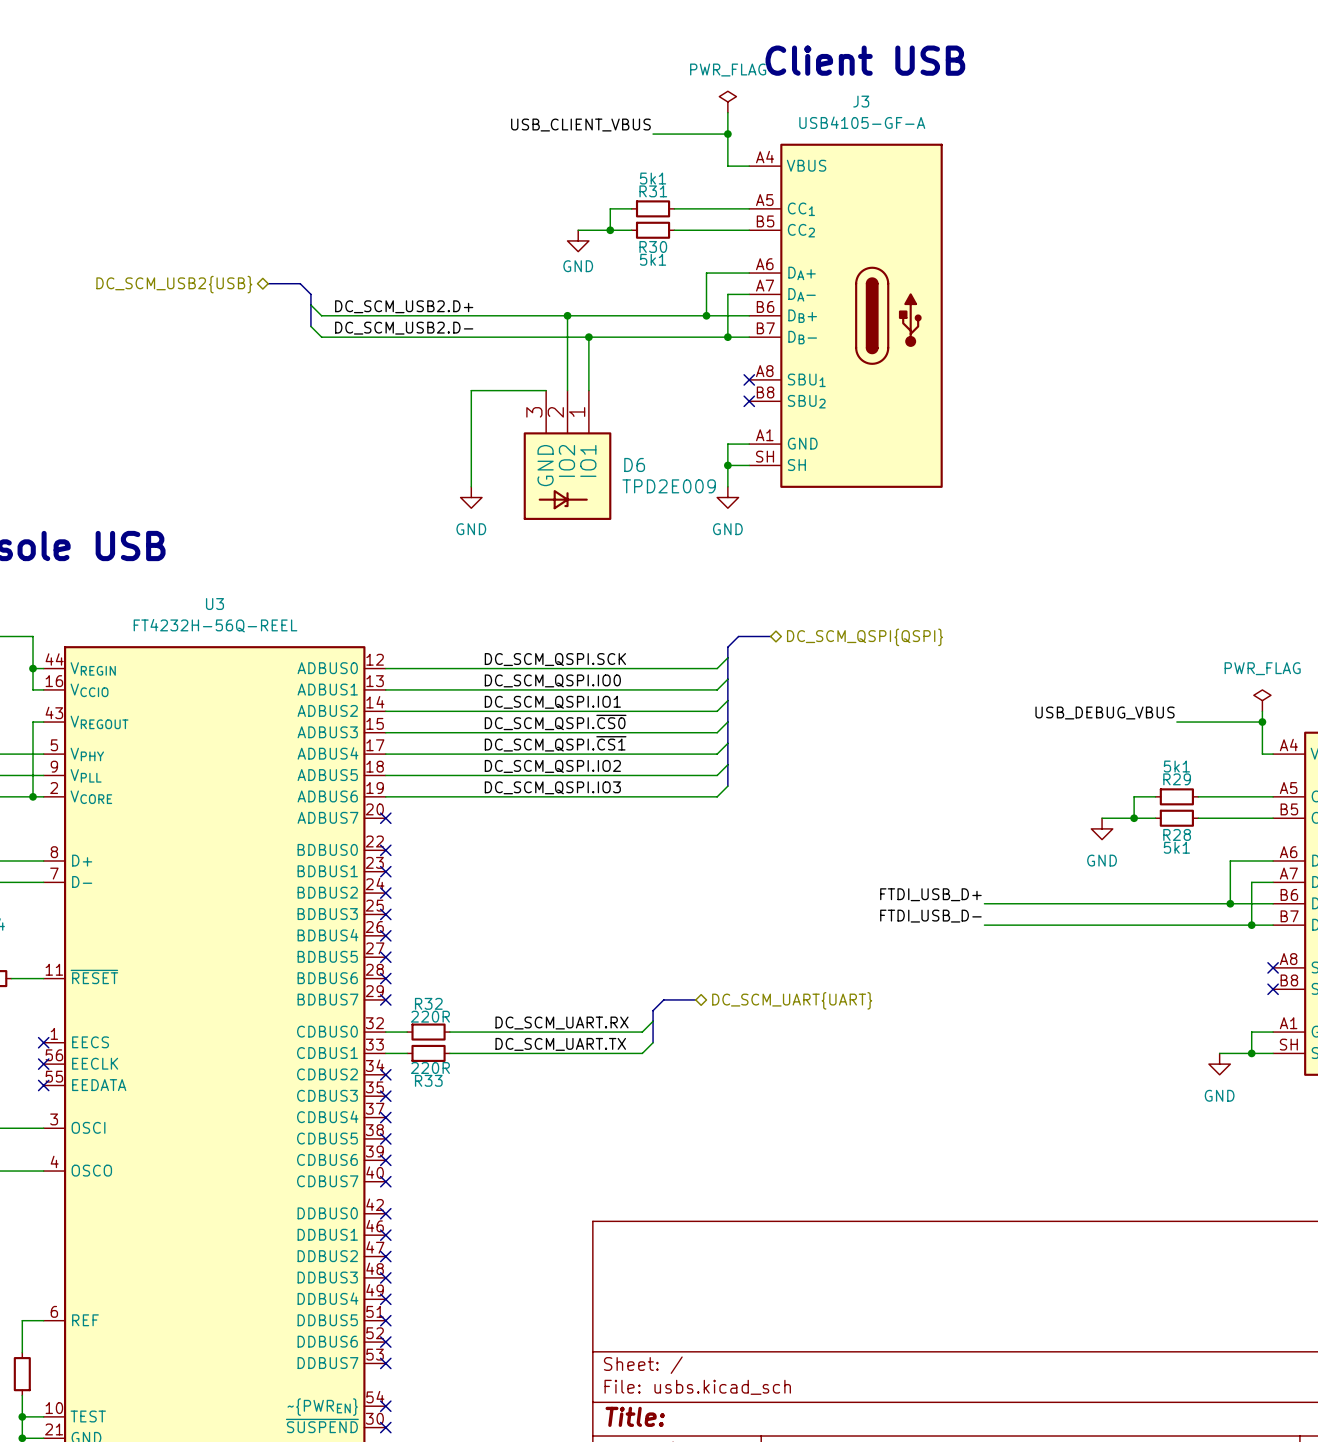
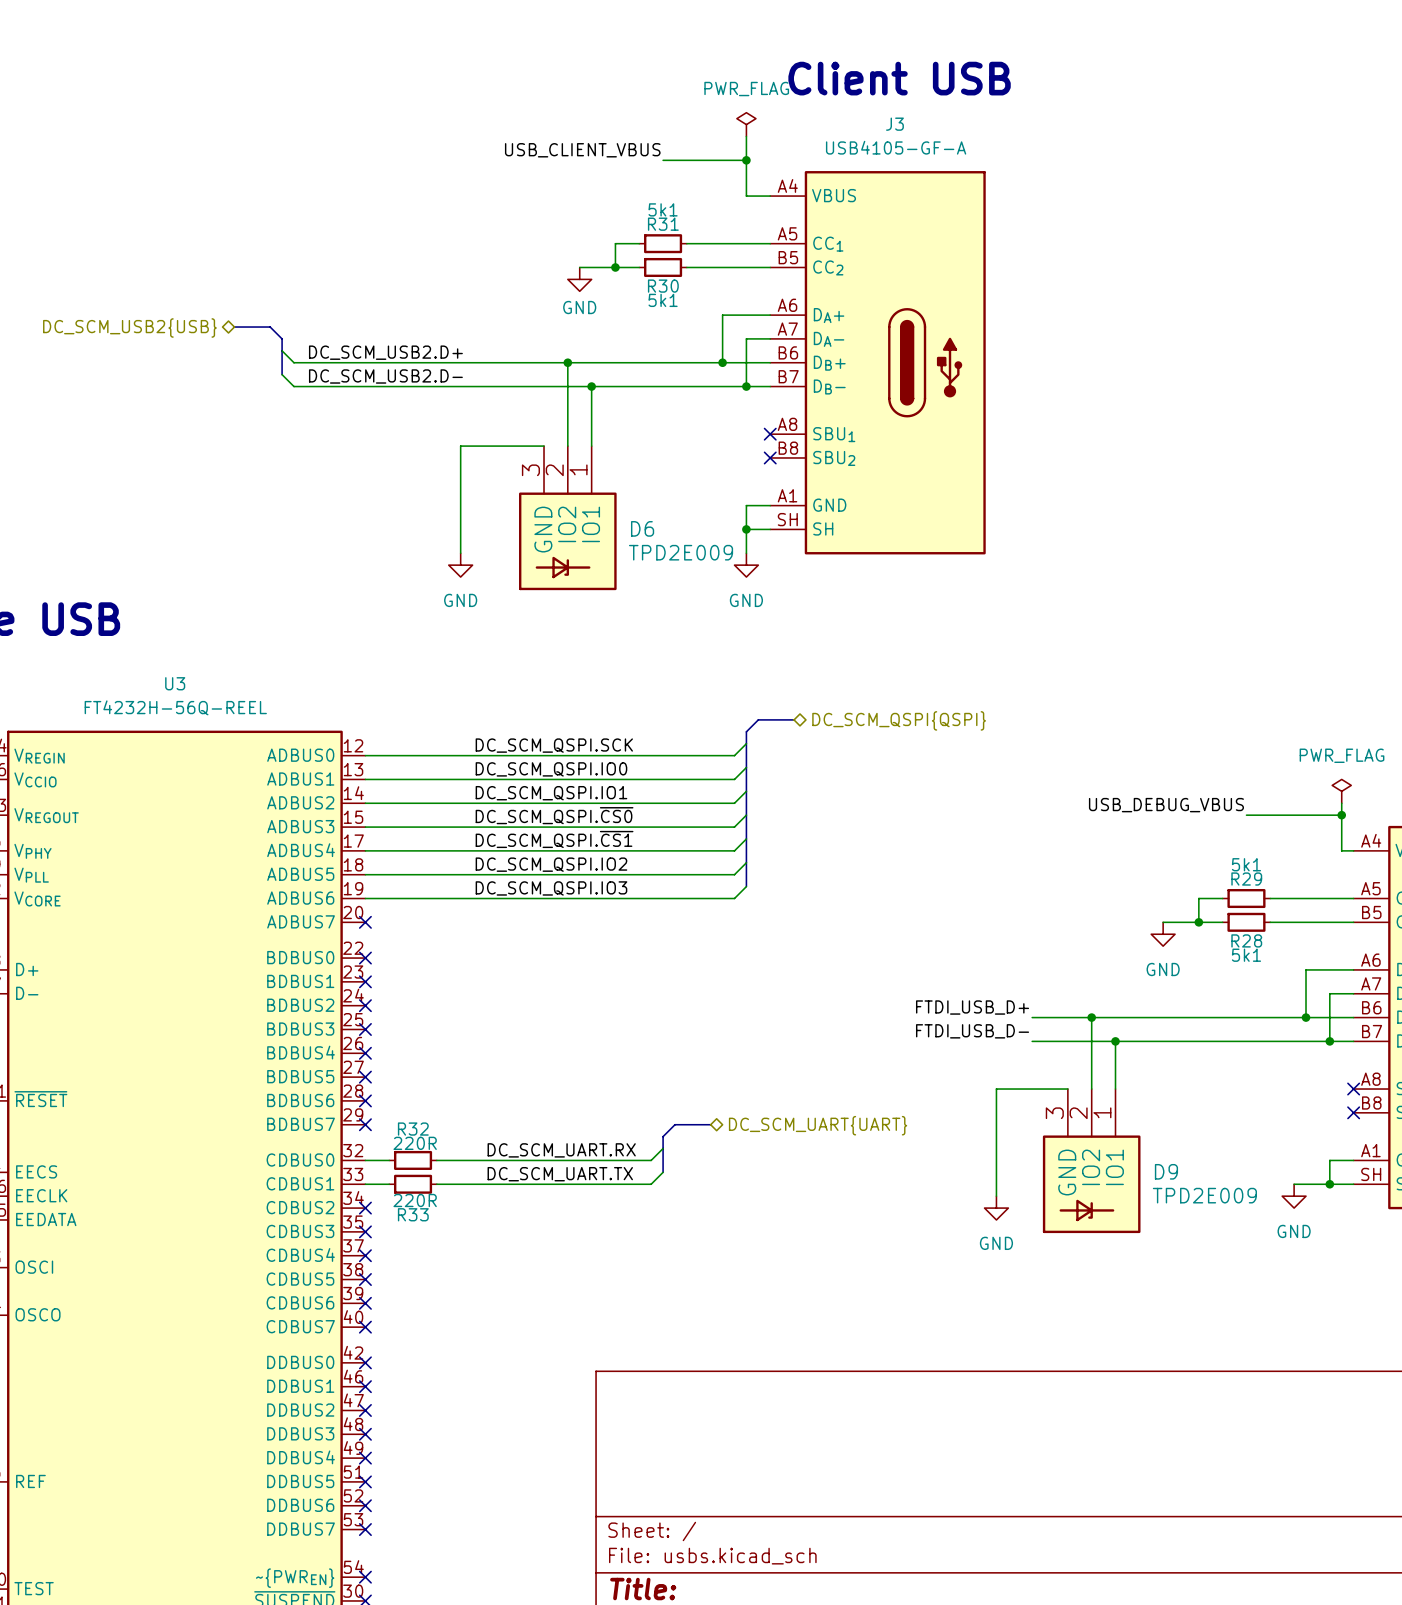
wire: none -> (1091, 1017) (1091, 1089)
junction: none -> (1091, 1017)
wire: none -> (1115, 1041) (1115, 1089)
junction: none -> (1115, 1041)
wire: none -> (1067, 1089) (996, 1089) (996, 1196)
D9: none -> TPD2E009 (1091, 1161)
power symbol: none -> GND (996, 1208)

